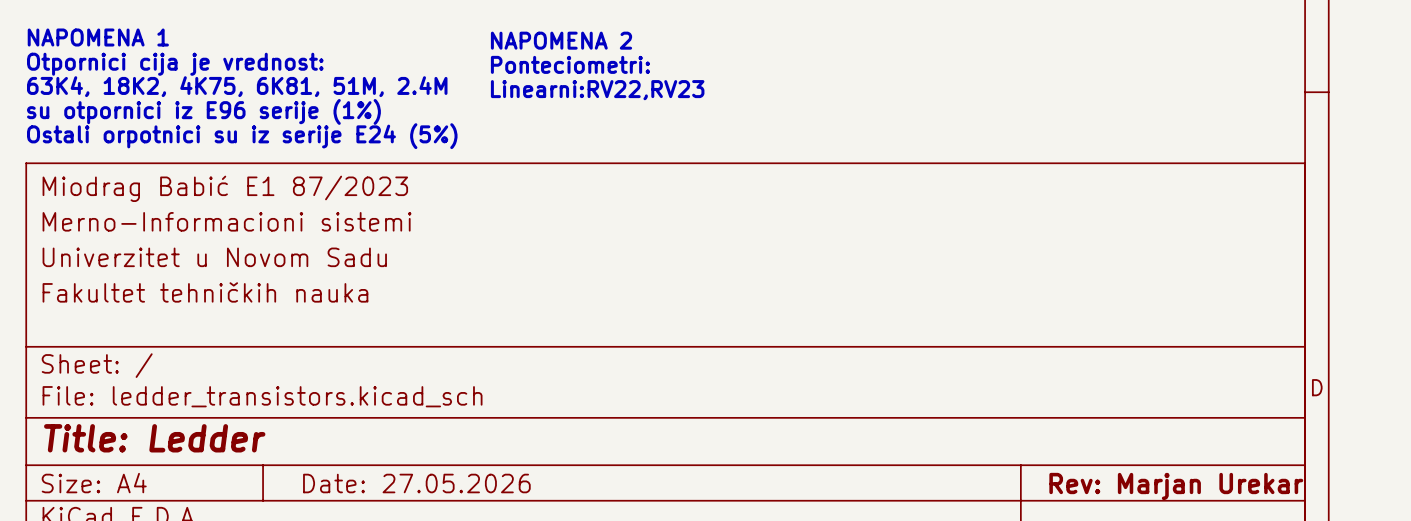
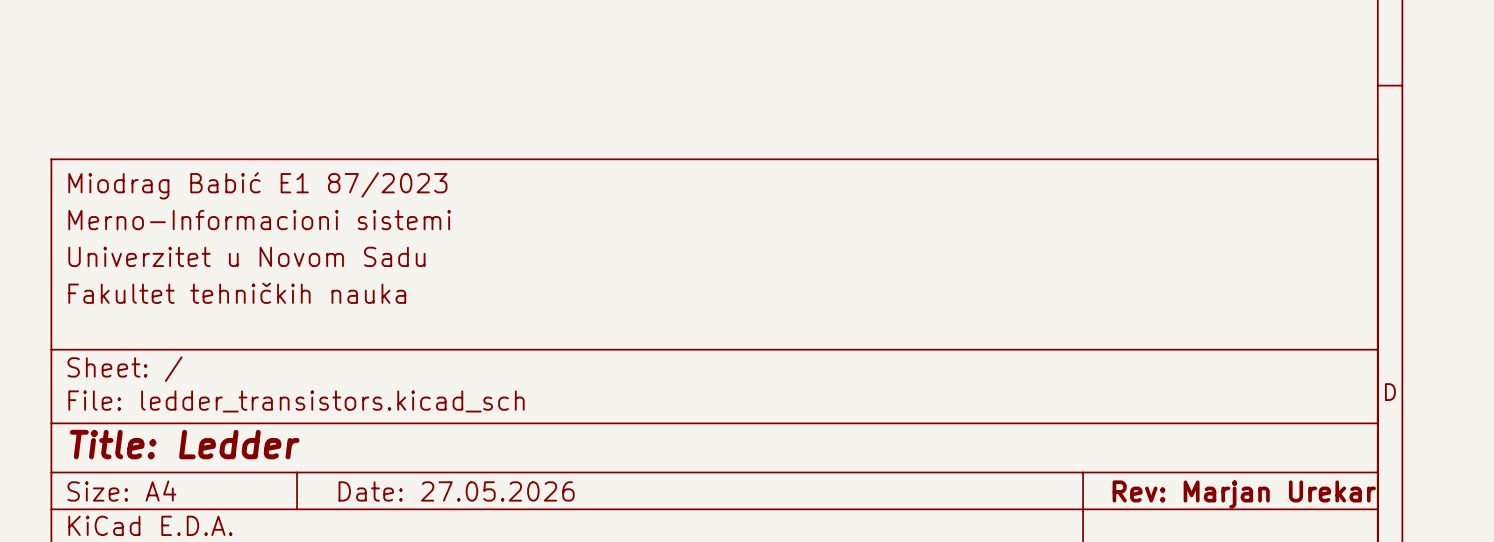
text: NAPOMENA 1 (98, 37) -> none
text: NAPOMENA 2 (561, 40) -> none
text: Otpornici cija je vrednost: (175, 64) -> none
text: Ponteciometri: (570, 64) -> none
text: 63K4, 18K2, 4K75, 6K81, 51M, 2.4M (237, 86) -> none
text: Linearni:RV22,RV23 (597, 90) -> none
text: su otpornici iz E96 serije (1%) (203, 111) -> none
text: Ostali orpotnici su iz serije E24 (5%) (242, 136) -> none

